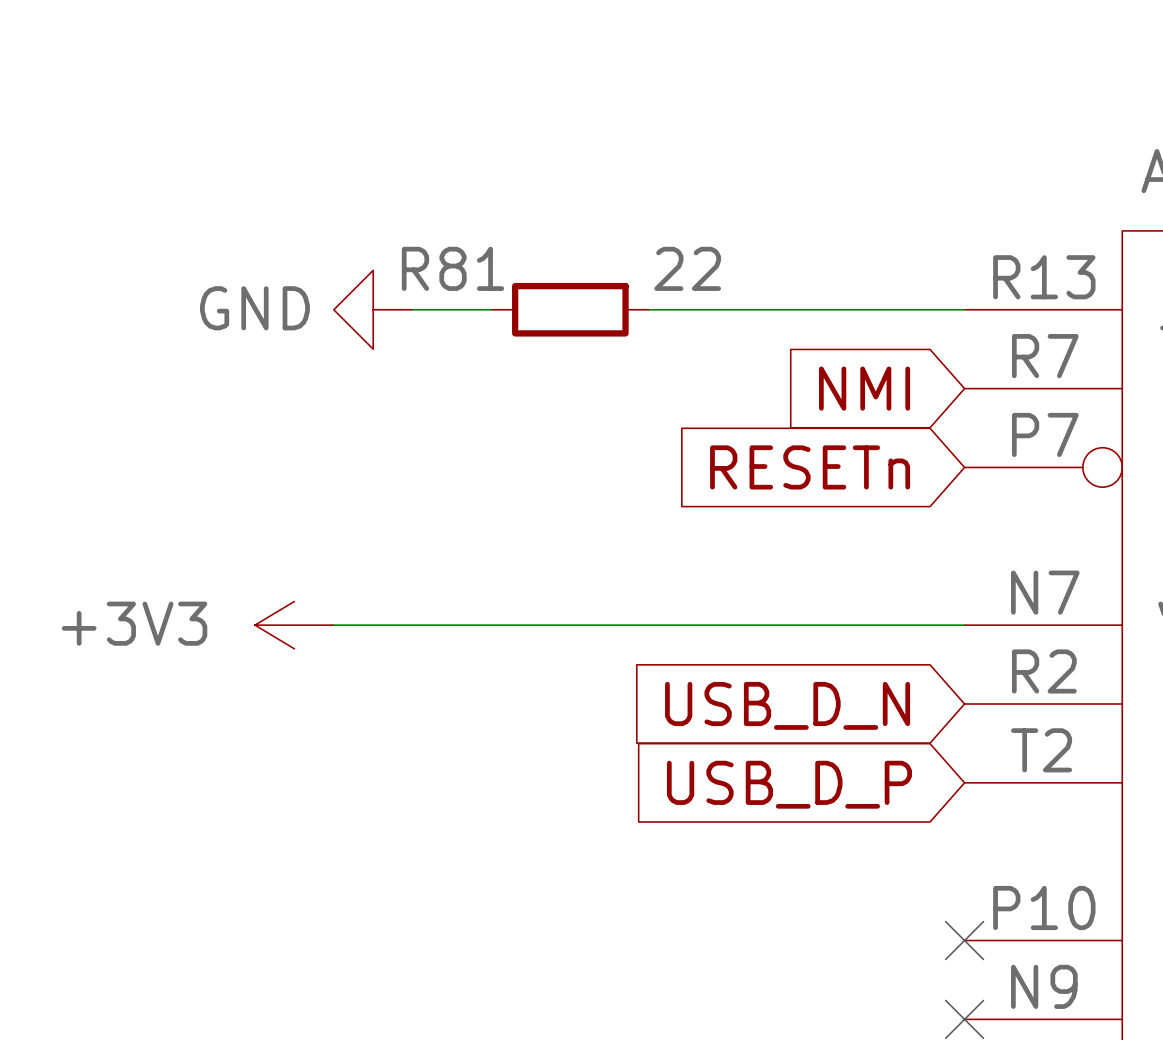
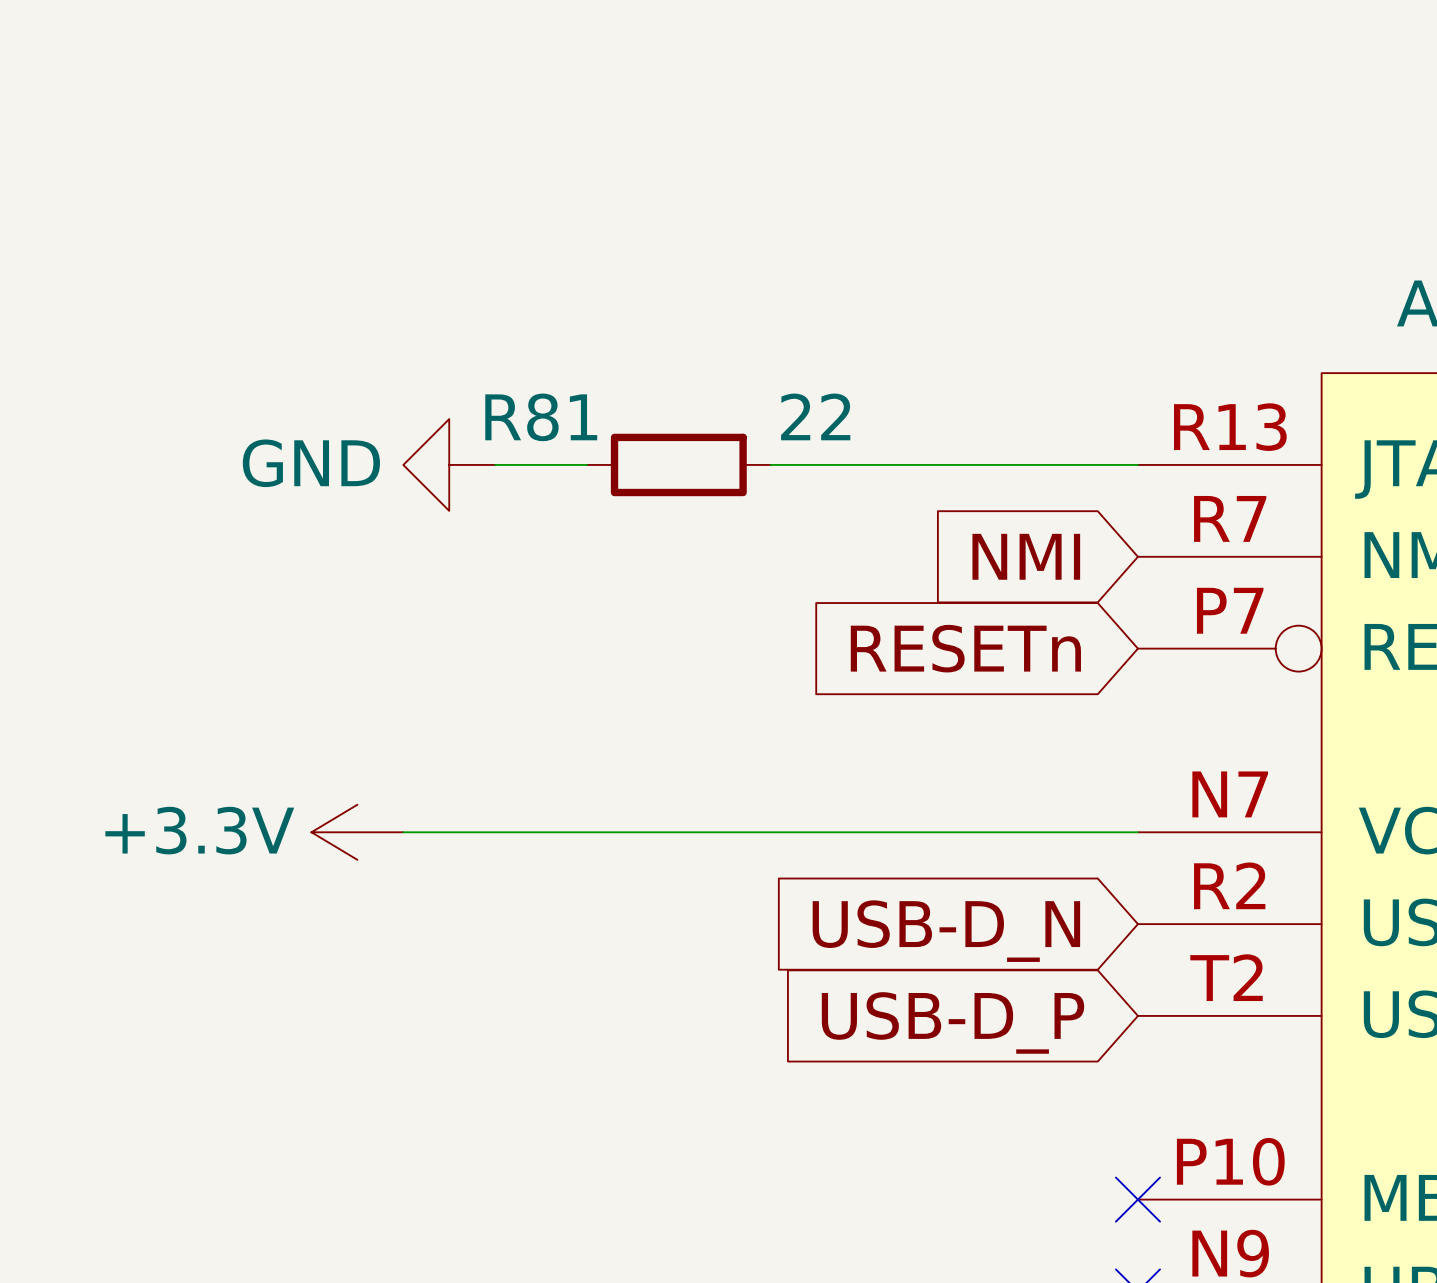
power symbol: +3V3 (294, 625) -> +3.3V (357, 832)
global label: USB_D_N (787, 705) -> USB-D_N (946, 931)
global label: USB_D_P (789, 784) -> USB-D_P (952, 1022)

